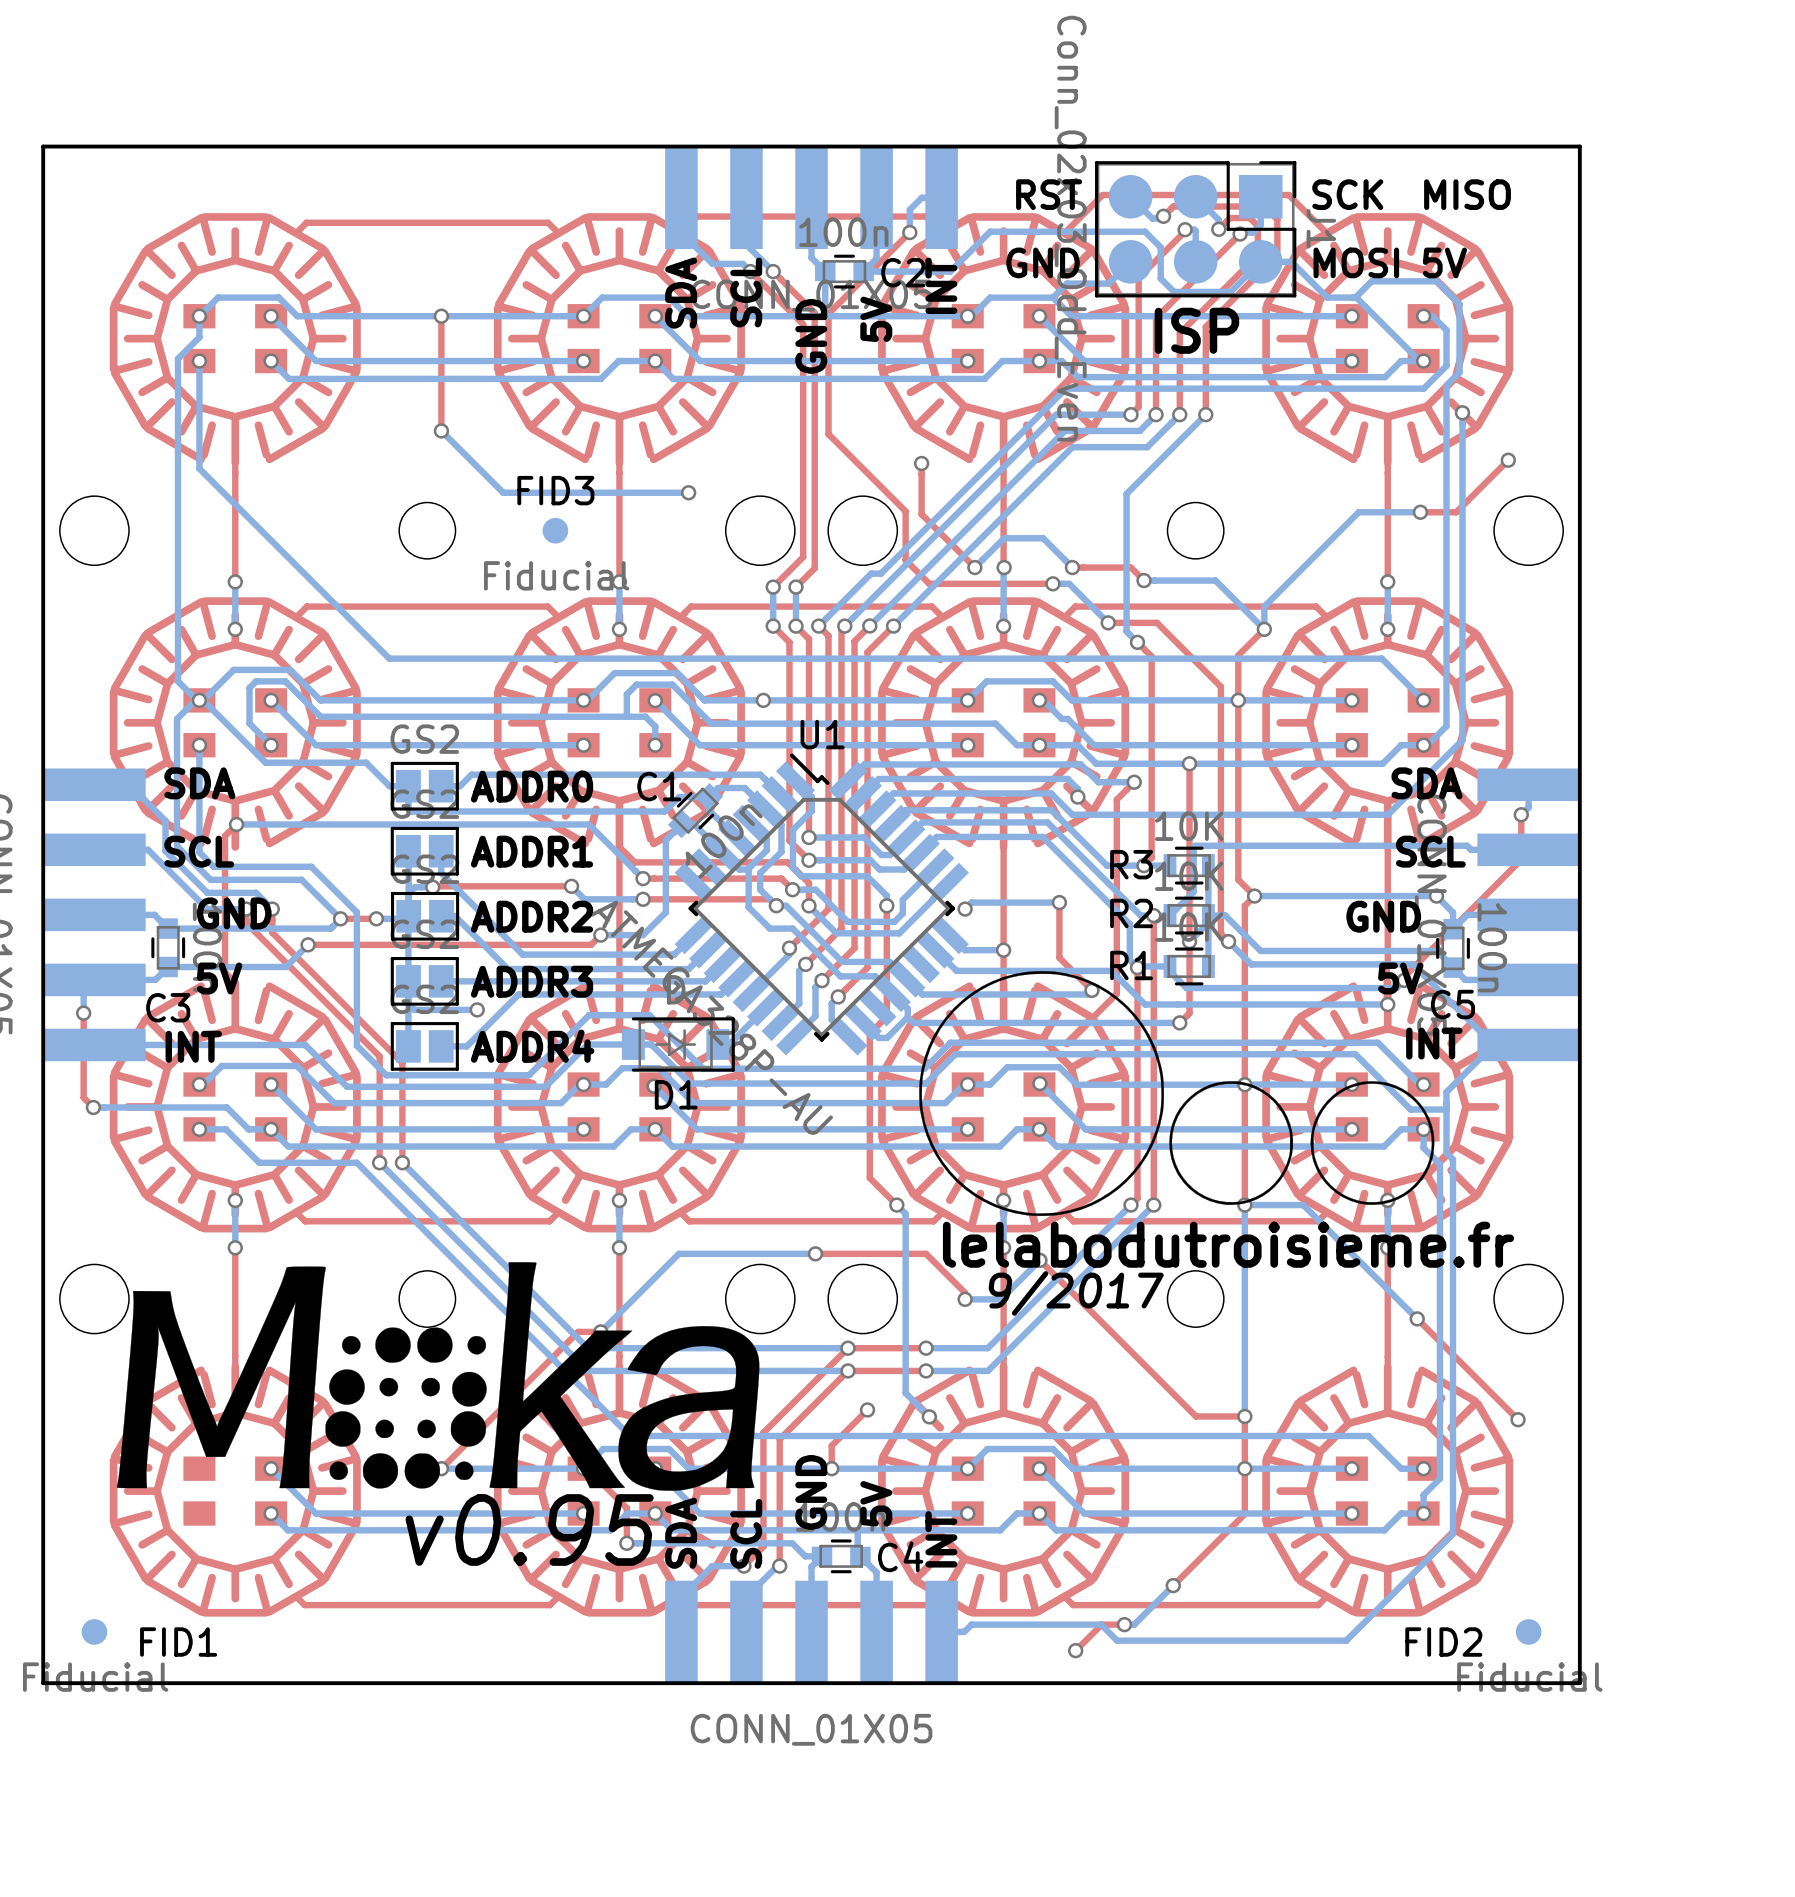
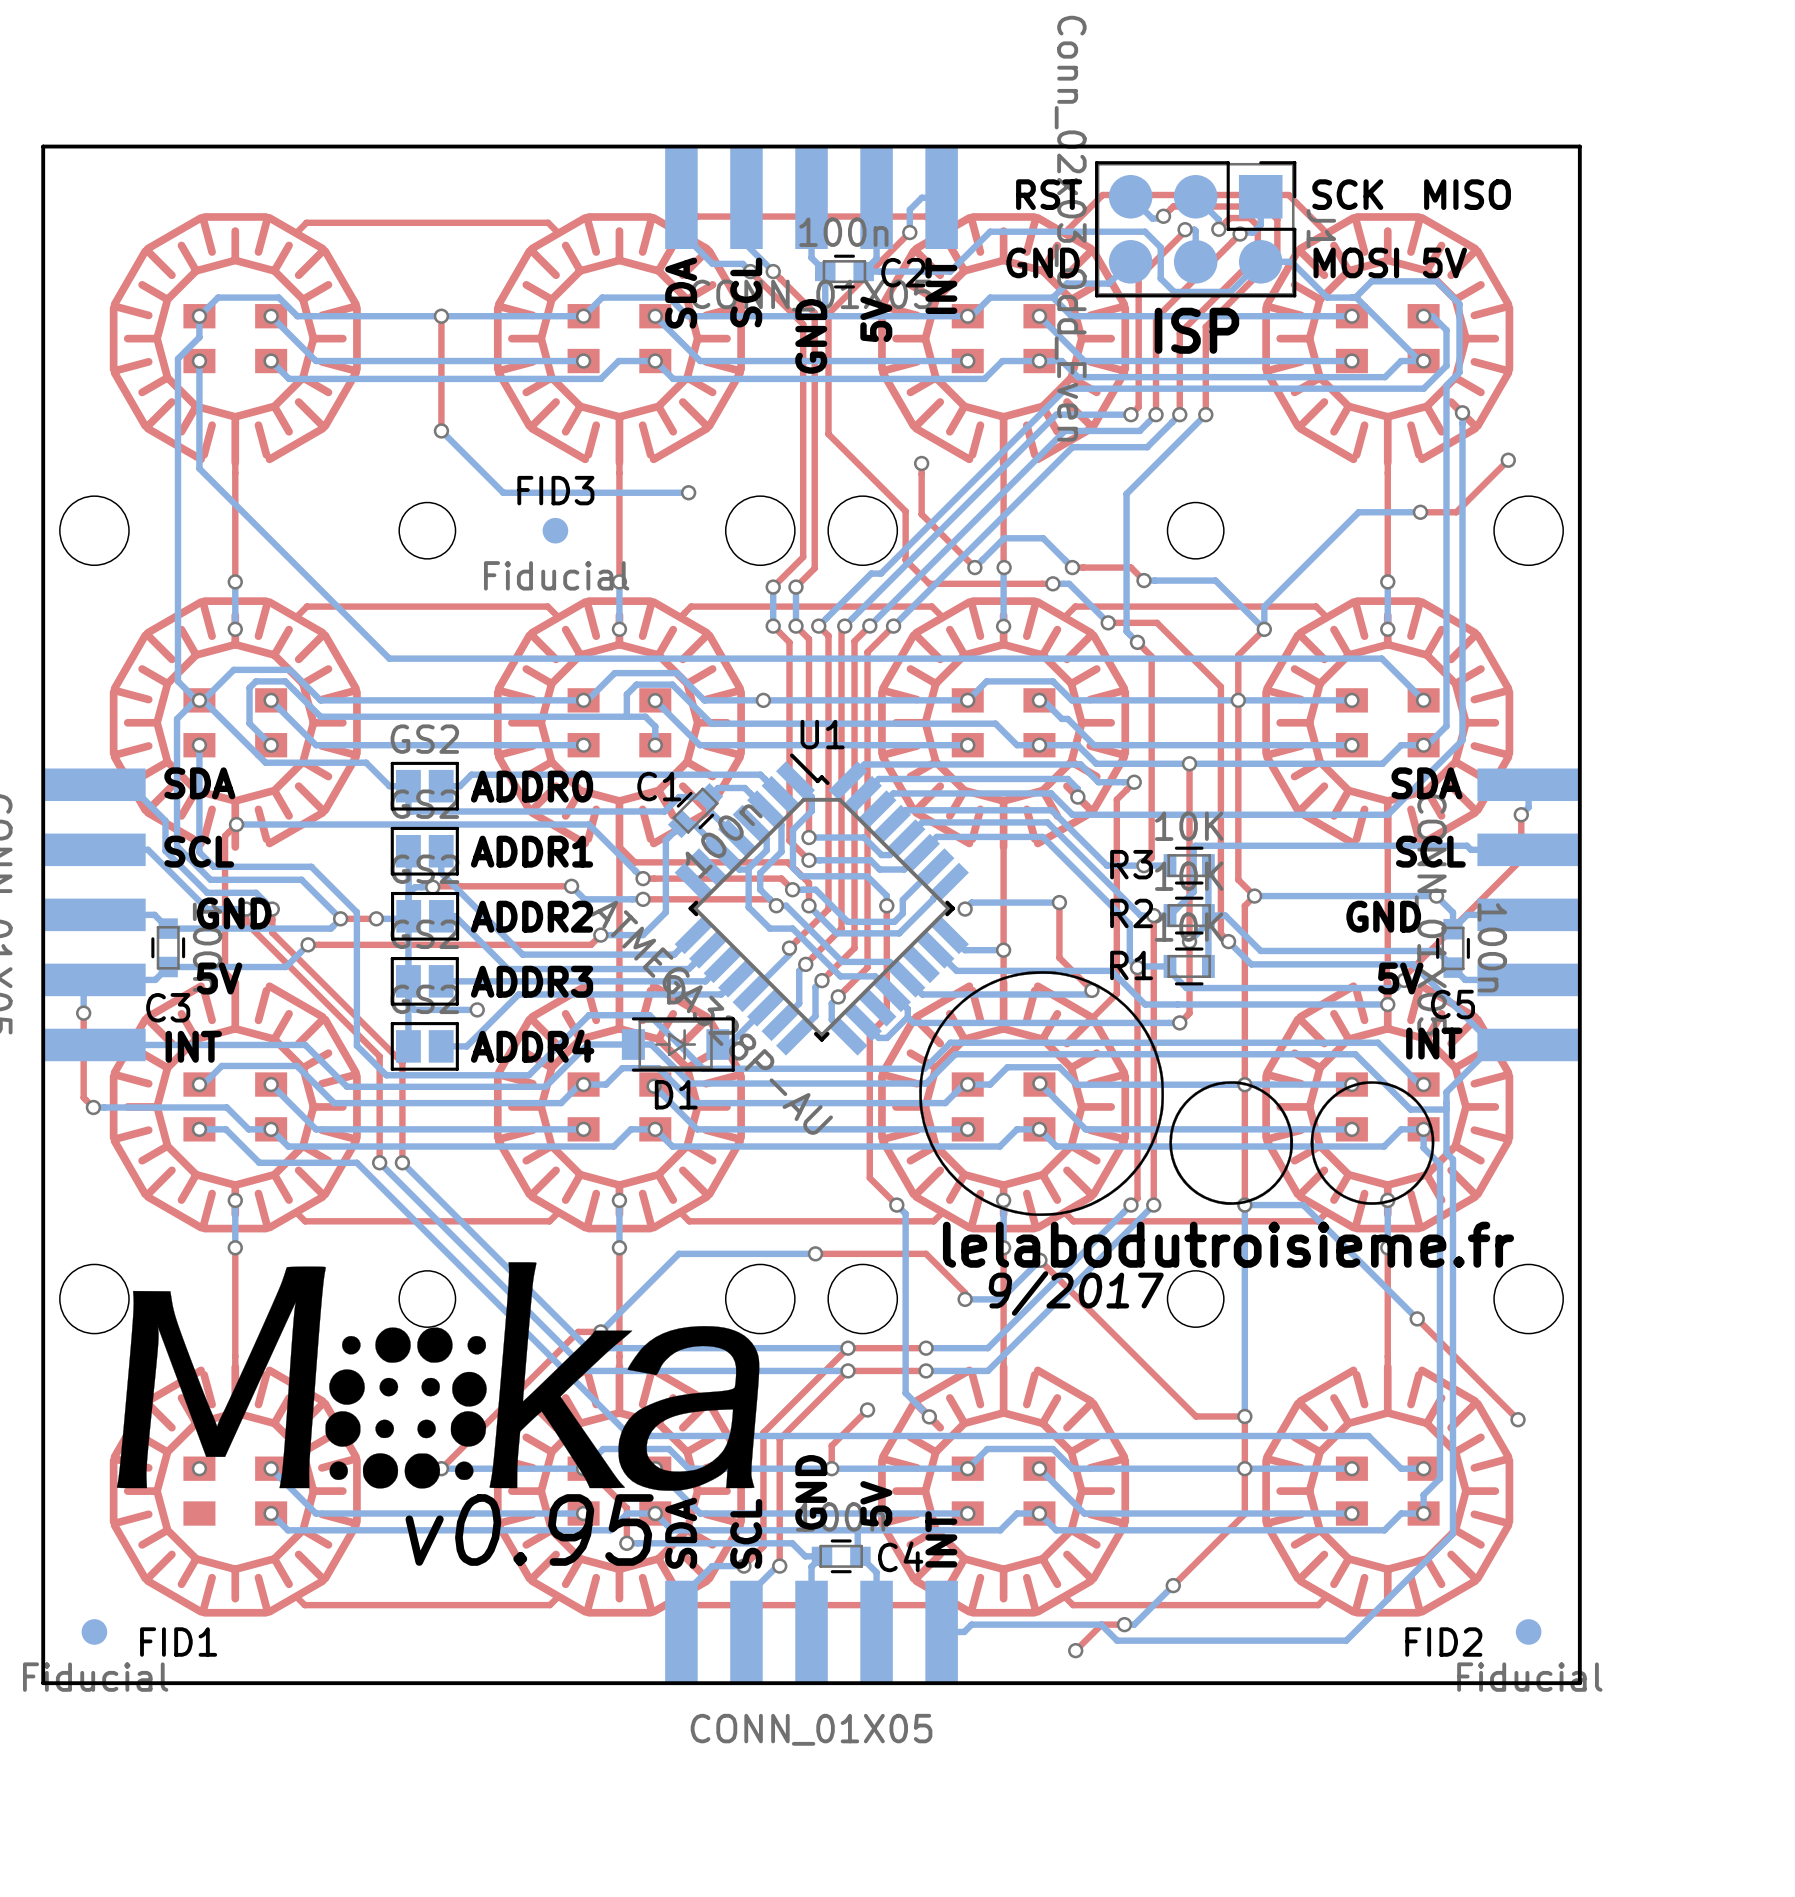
via: none -> (199, 1468)

